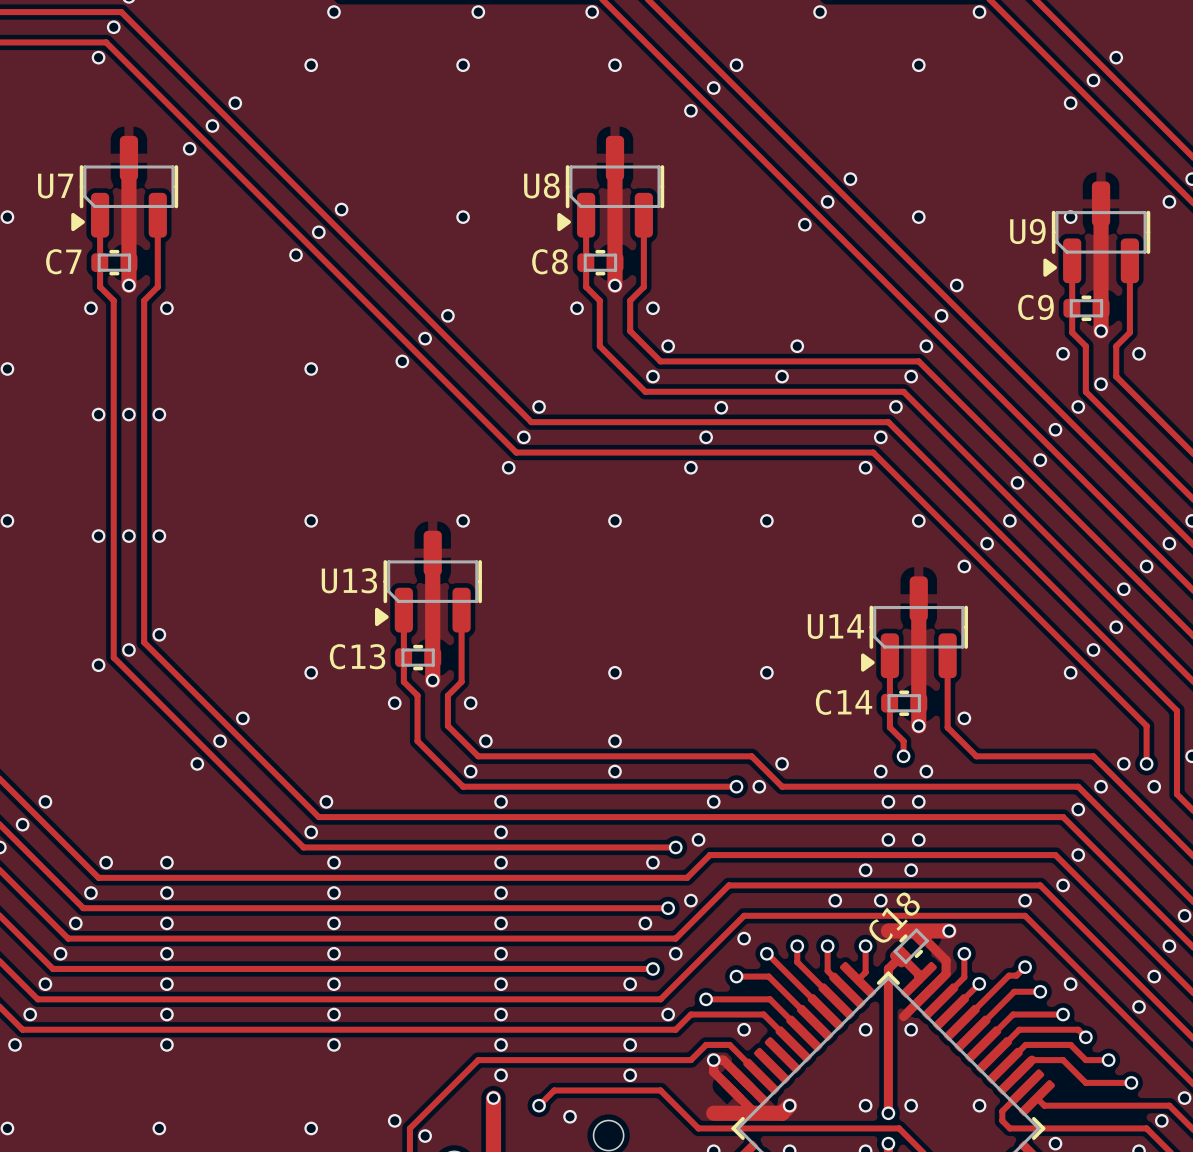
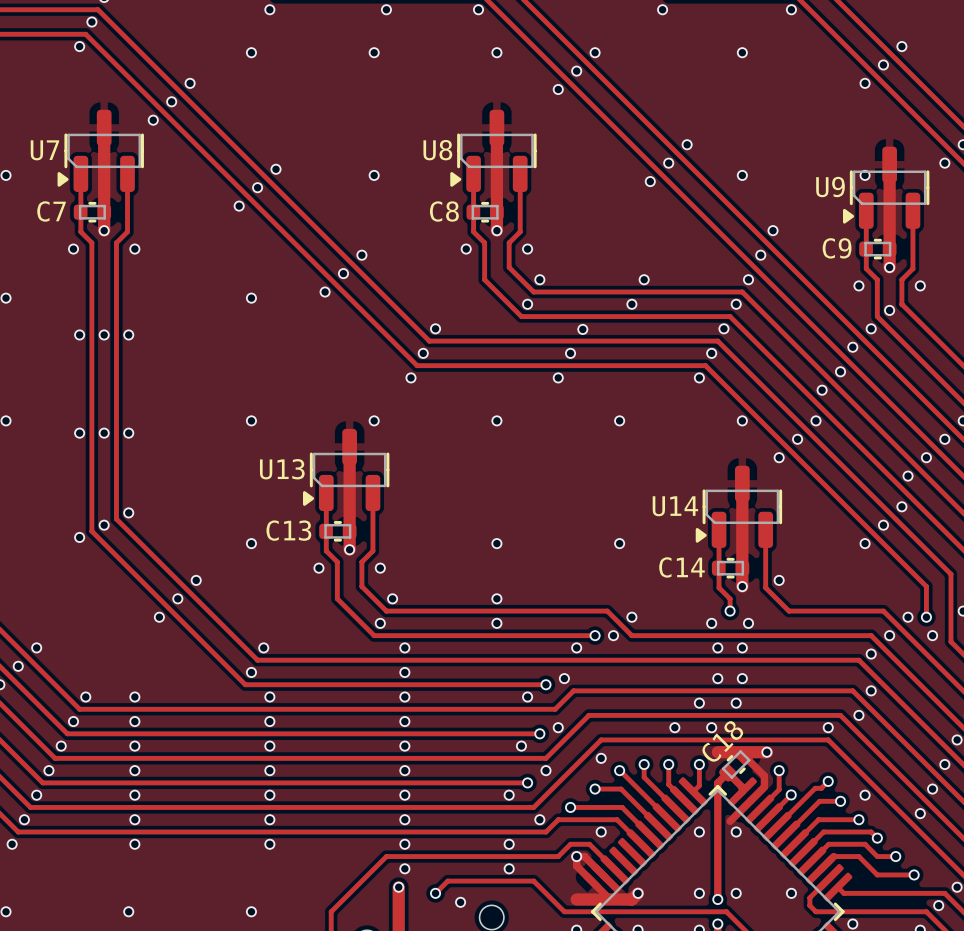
via: (394, 1120) -> none
via: (425, 1136) -> none

